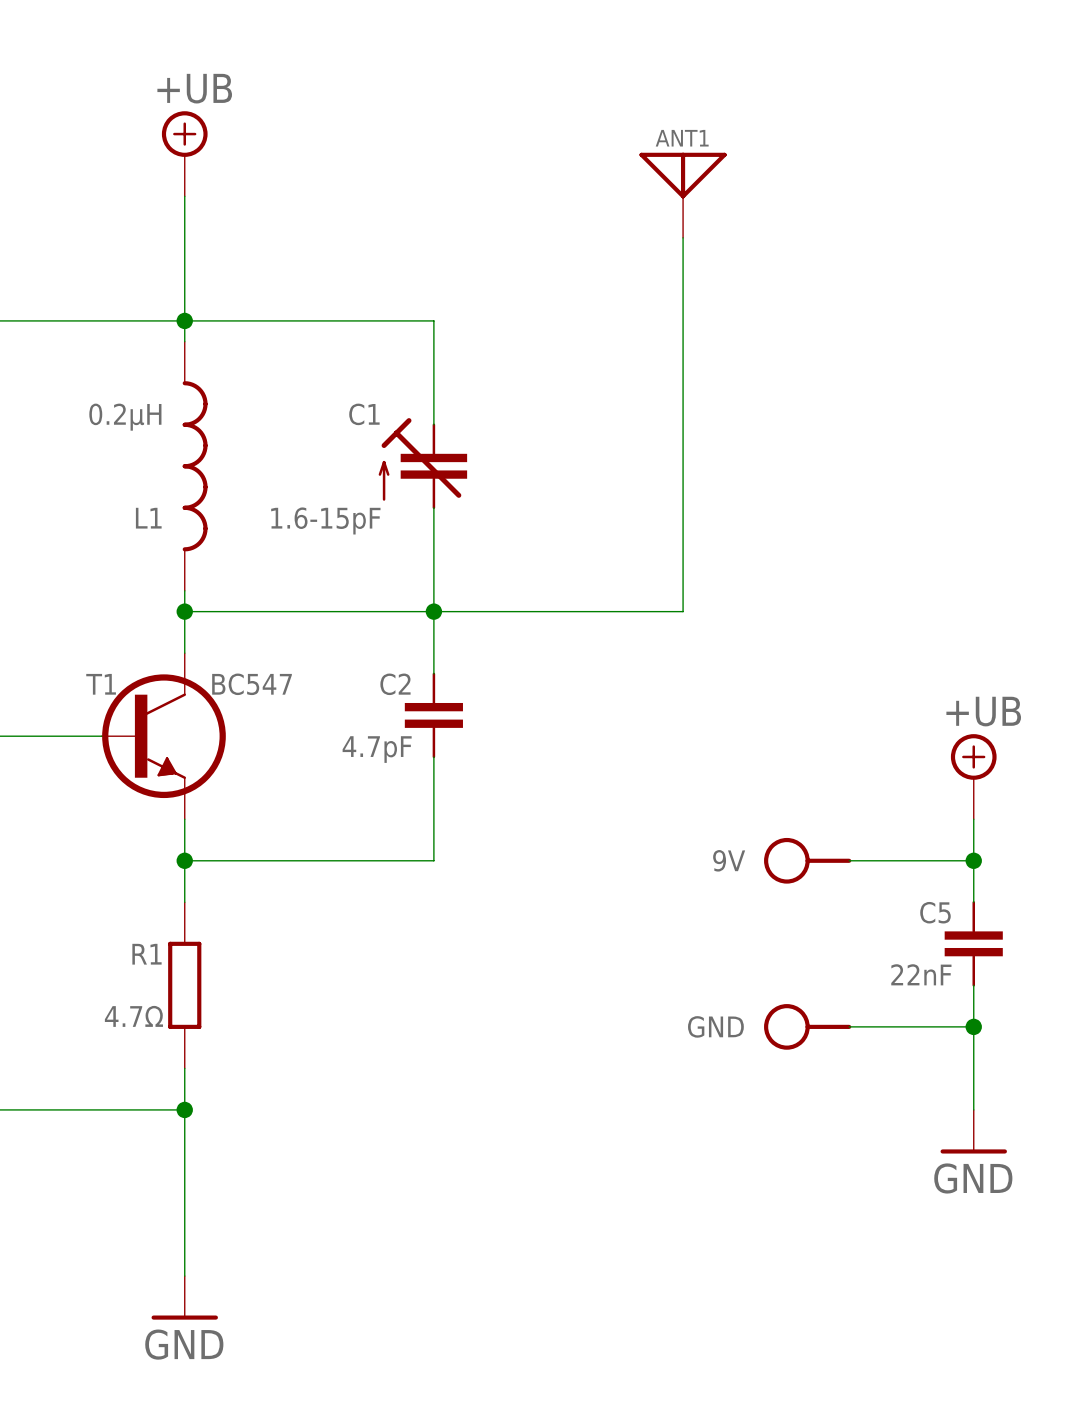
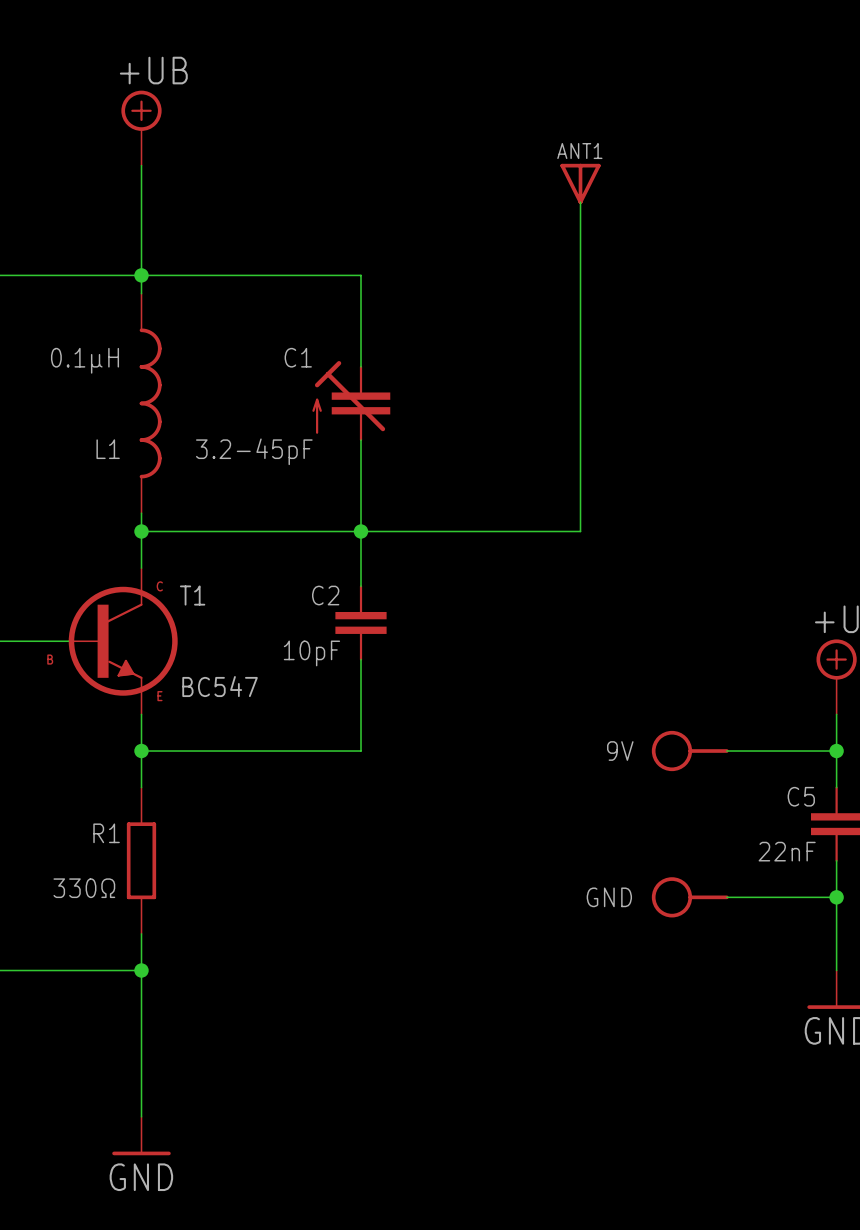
ANT1 symbol: [639, 152, 727, 238] -> [560, 163, 601, 205]
L1 value: 0.2μH (125, 417) -> 0.1μH (85, 360)
C1 value: 1.6-15pF (325, 520) -> 3.2-45pF (254, 451)
T1 text: none -> C (159, 586)
T1 name position: T1 (101, 684) -> T1 (192, 595)
T1 value position: BC547 (252, 684) -> BC547 (220, 686)
C2 value: 4.7pF (377, 749) -> 10pF (311, 653)
T1 text: none -> B (50, 659)
T1 text: none -> E (159, 696)
R1 value: 4.7Ω (133, 1016) -> 330Ω (84, 888)

